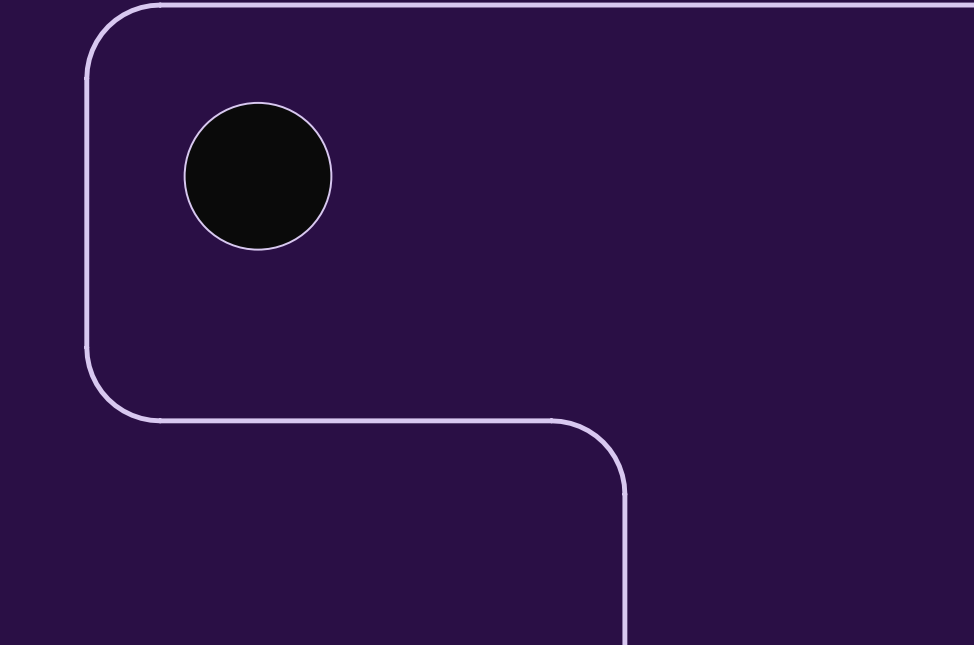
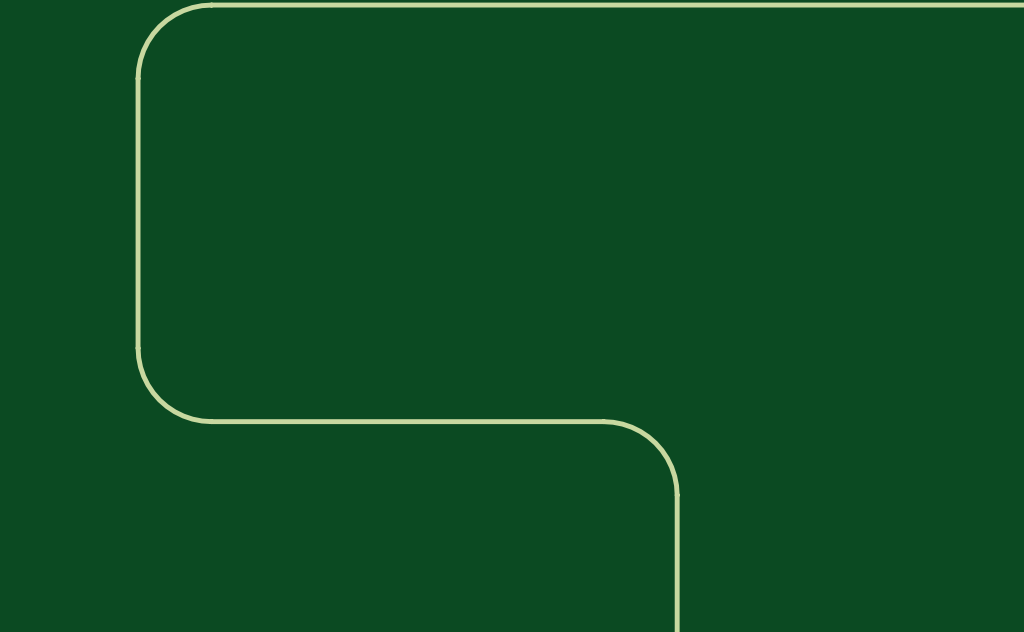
part: (258, 176) -> none

